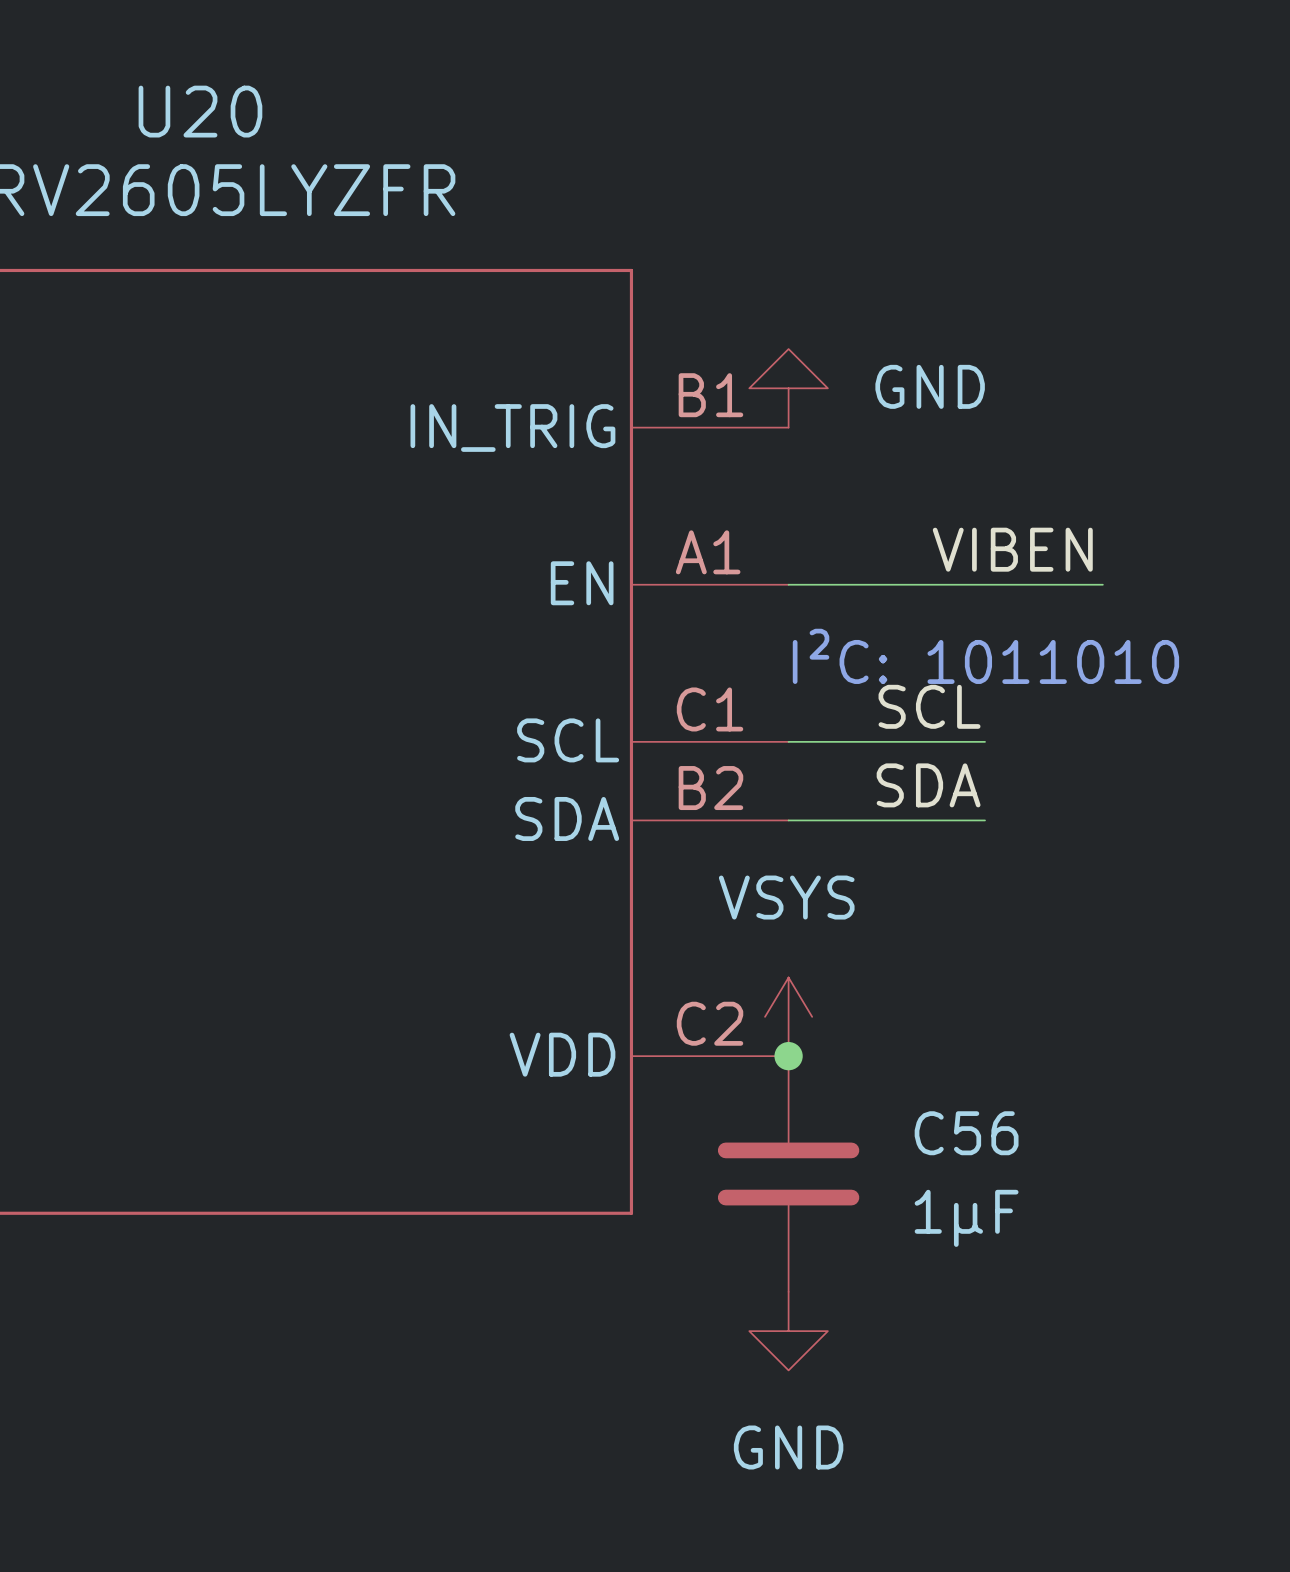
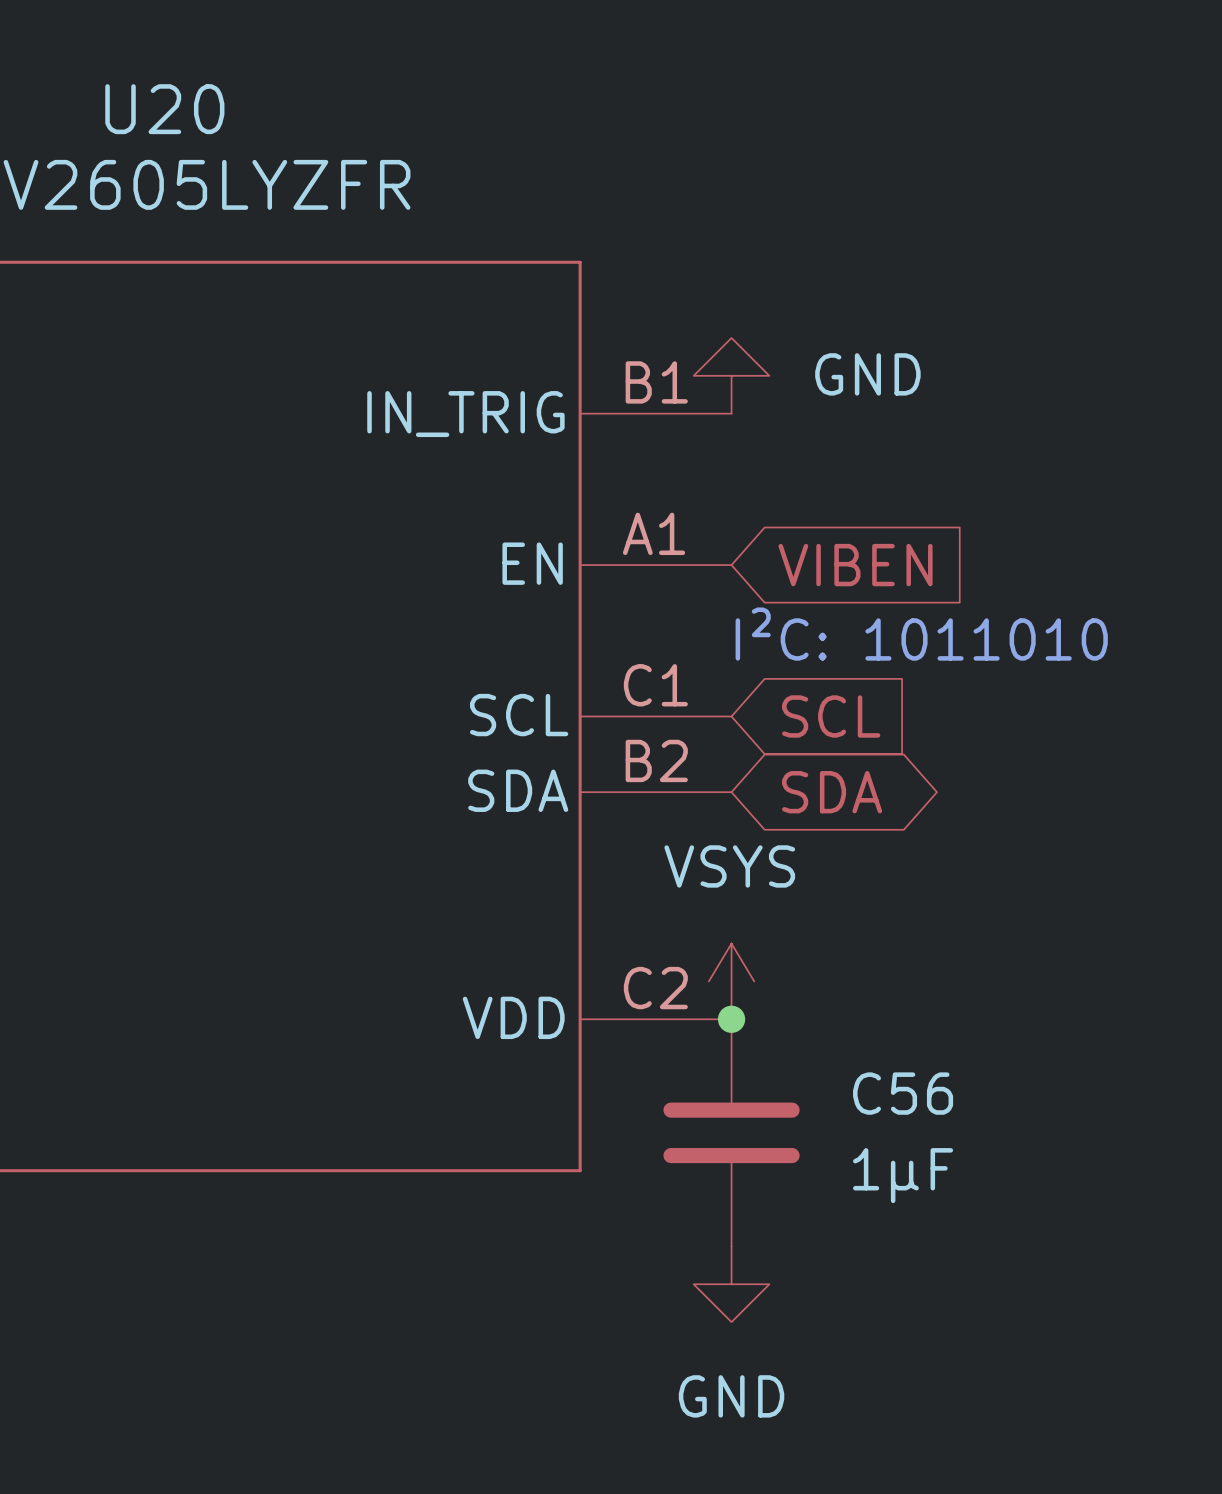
label: VIBEN (1012, 549) -> none
wire: (788, 584) (1102, 584) -> none
global label: none -> VIBEN (855, 565)
label: SCL (929, 706) -> none
wire: (788, 741) (985, 741) -> none
global label: none -> SCL (831, 716)
label: SDA (928, 785) -> none
wire: (788, 820) (985, 820) -> none
global label: none -> SDA (832, 792)

